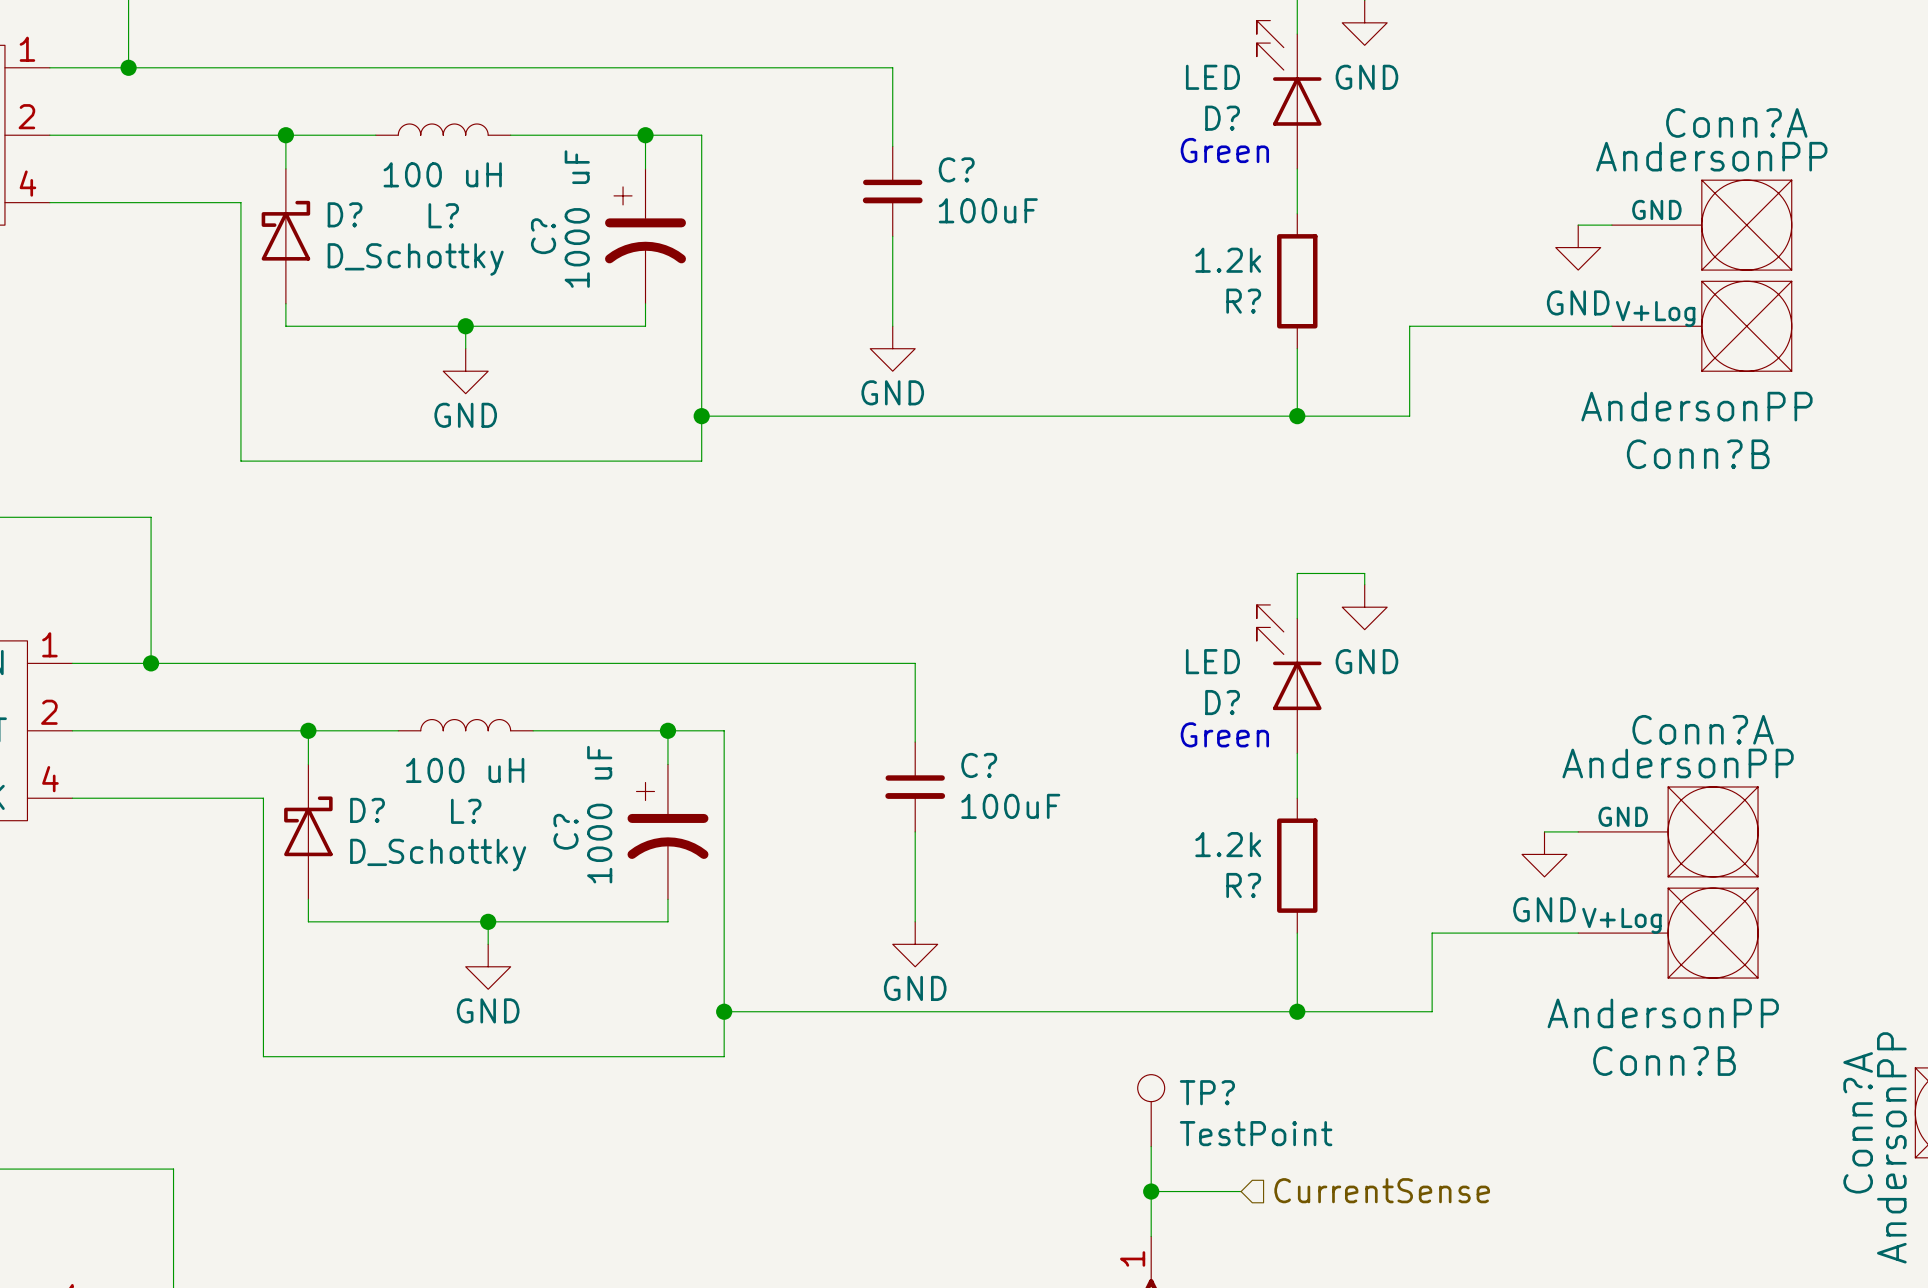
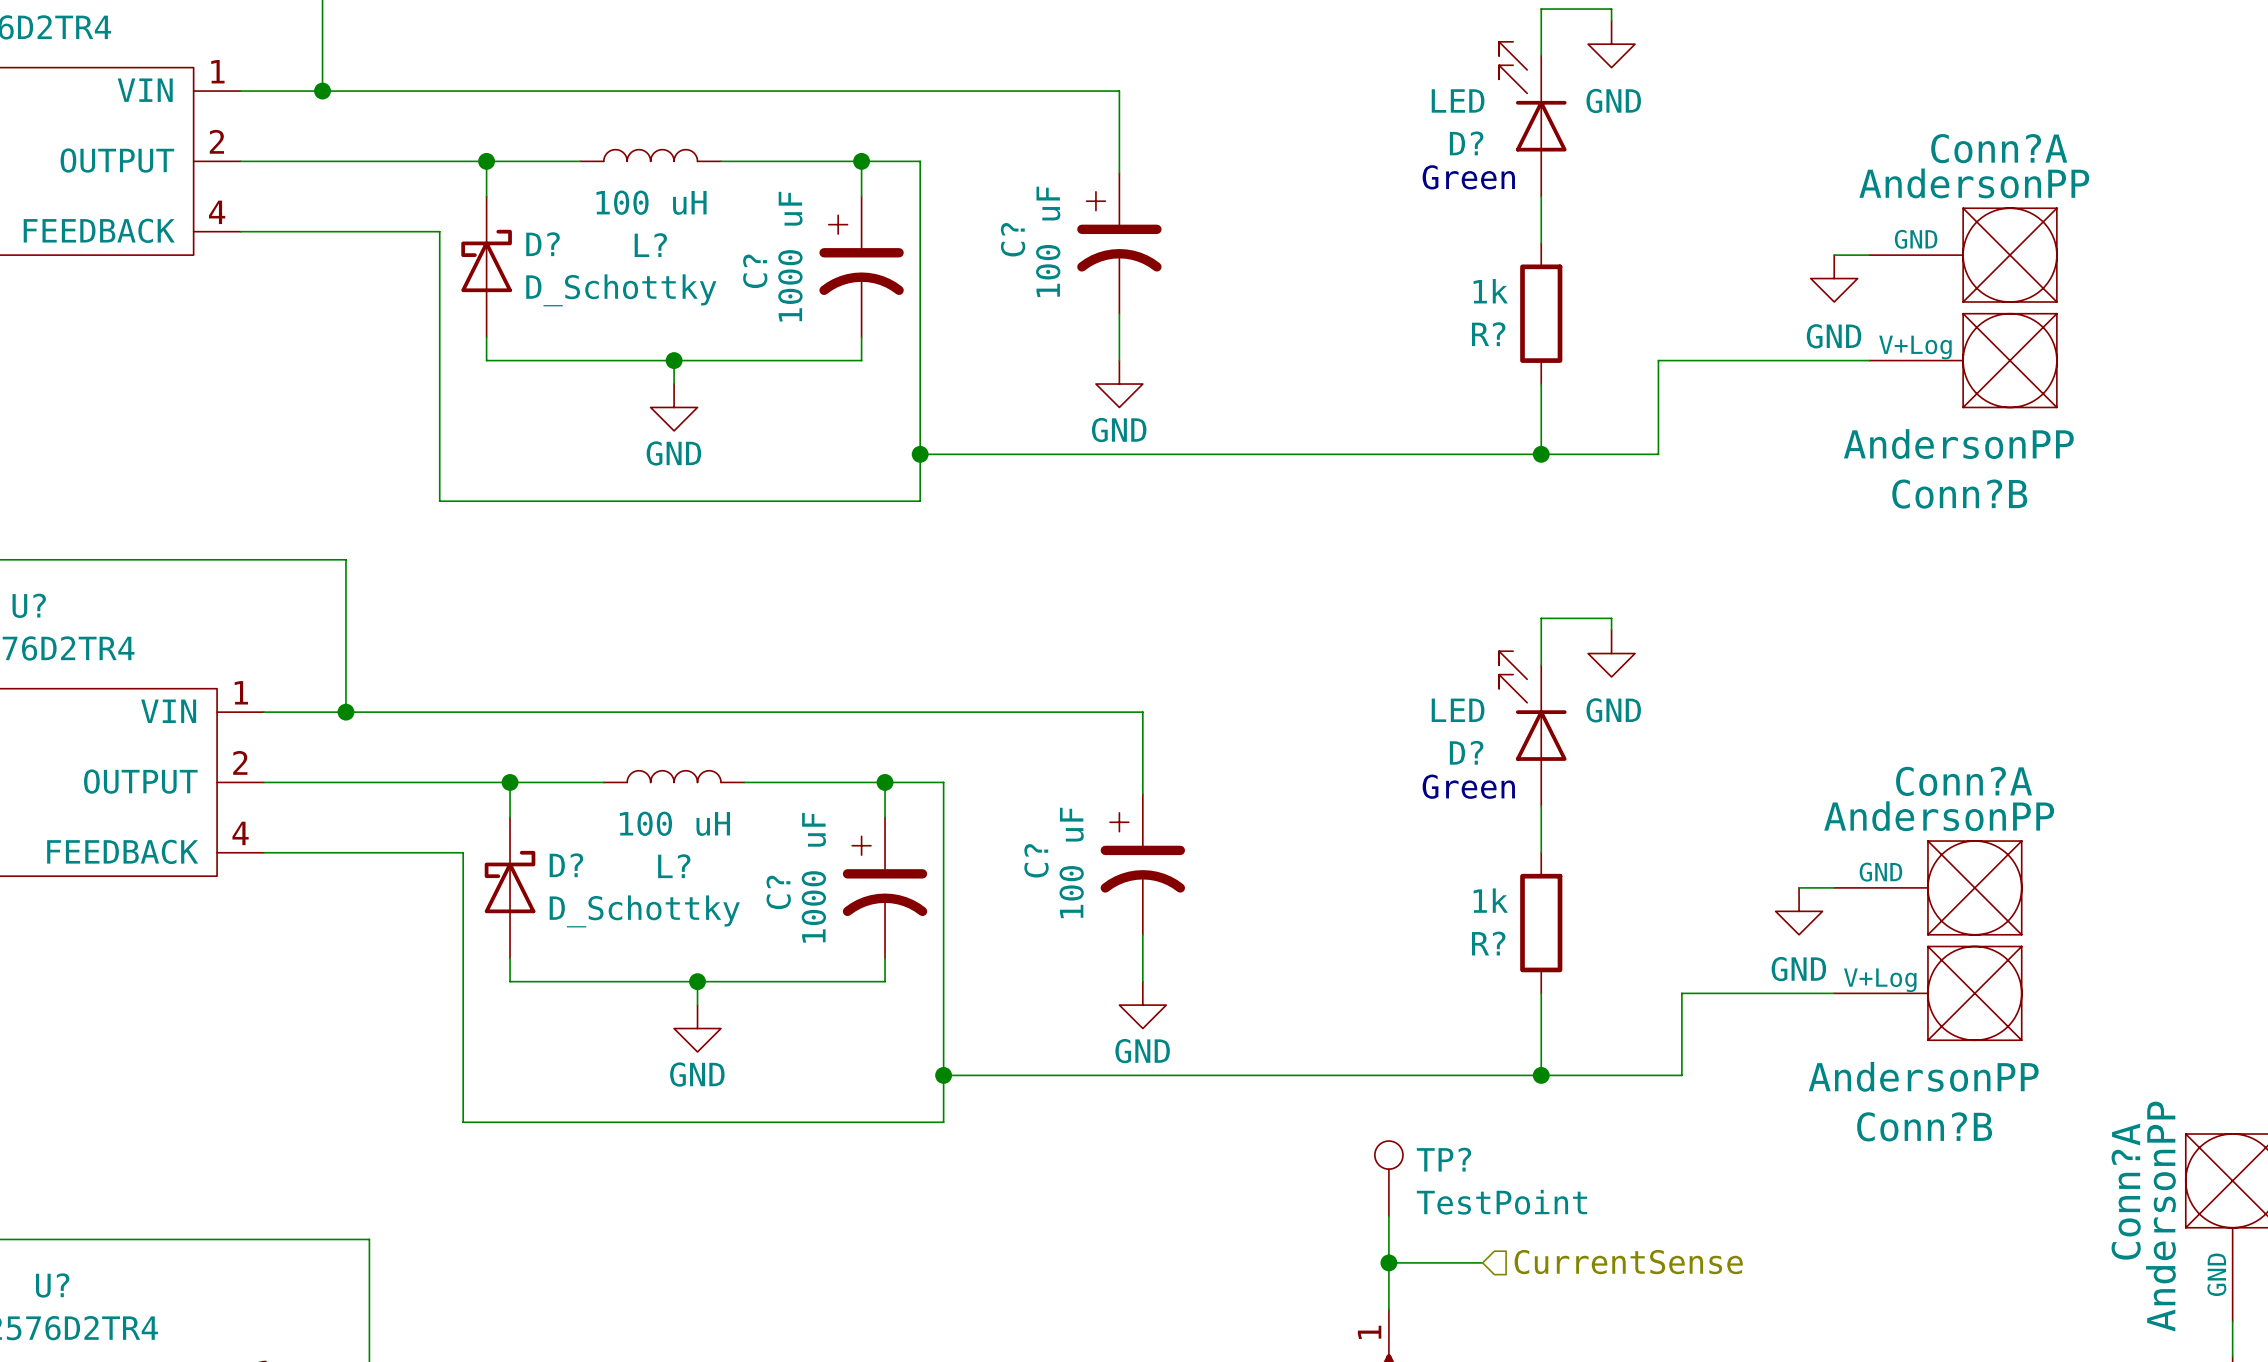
C?: 100uF (892, 191) -> none
C?: none -> 100 uF (1119, 243)
R? value: 1.2k (1228, 260) -> 1k (1490, 291)
C?: 100uF (915, 786) -> none
C?: none -> 100 uF (1142, 864)
R? value: 1.2k (1228, 844) -> 1k (1490, 900)

